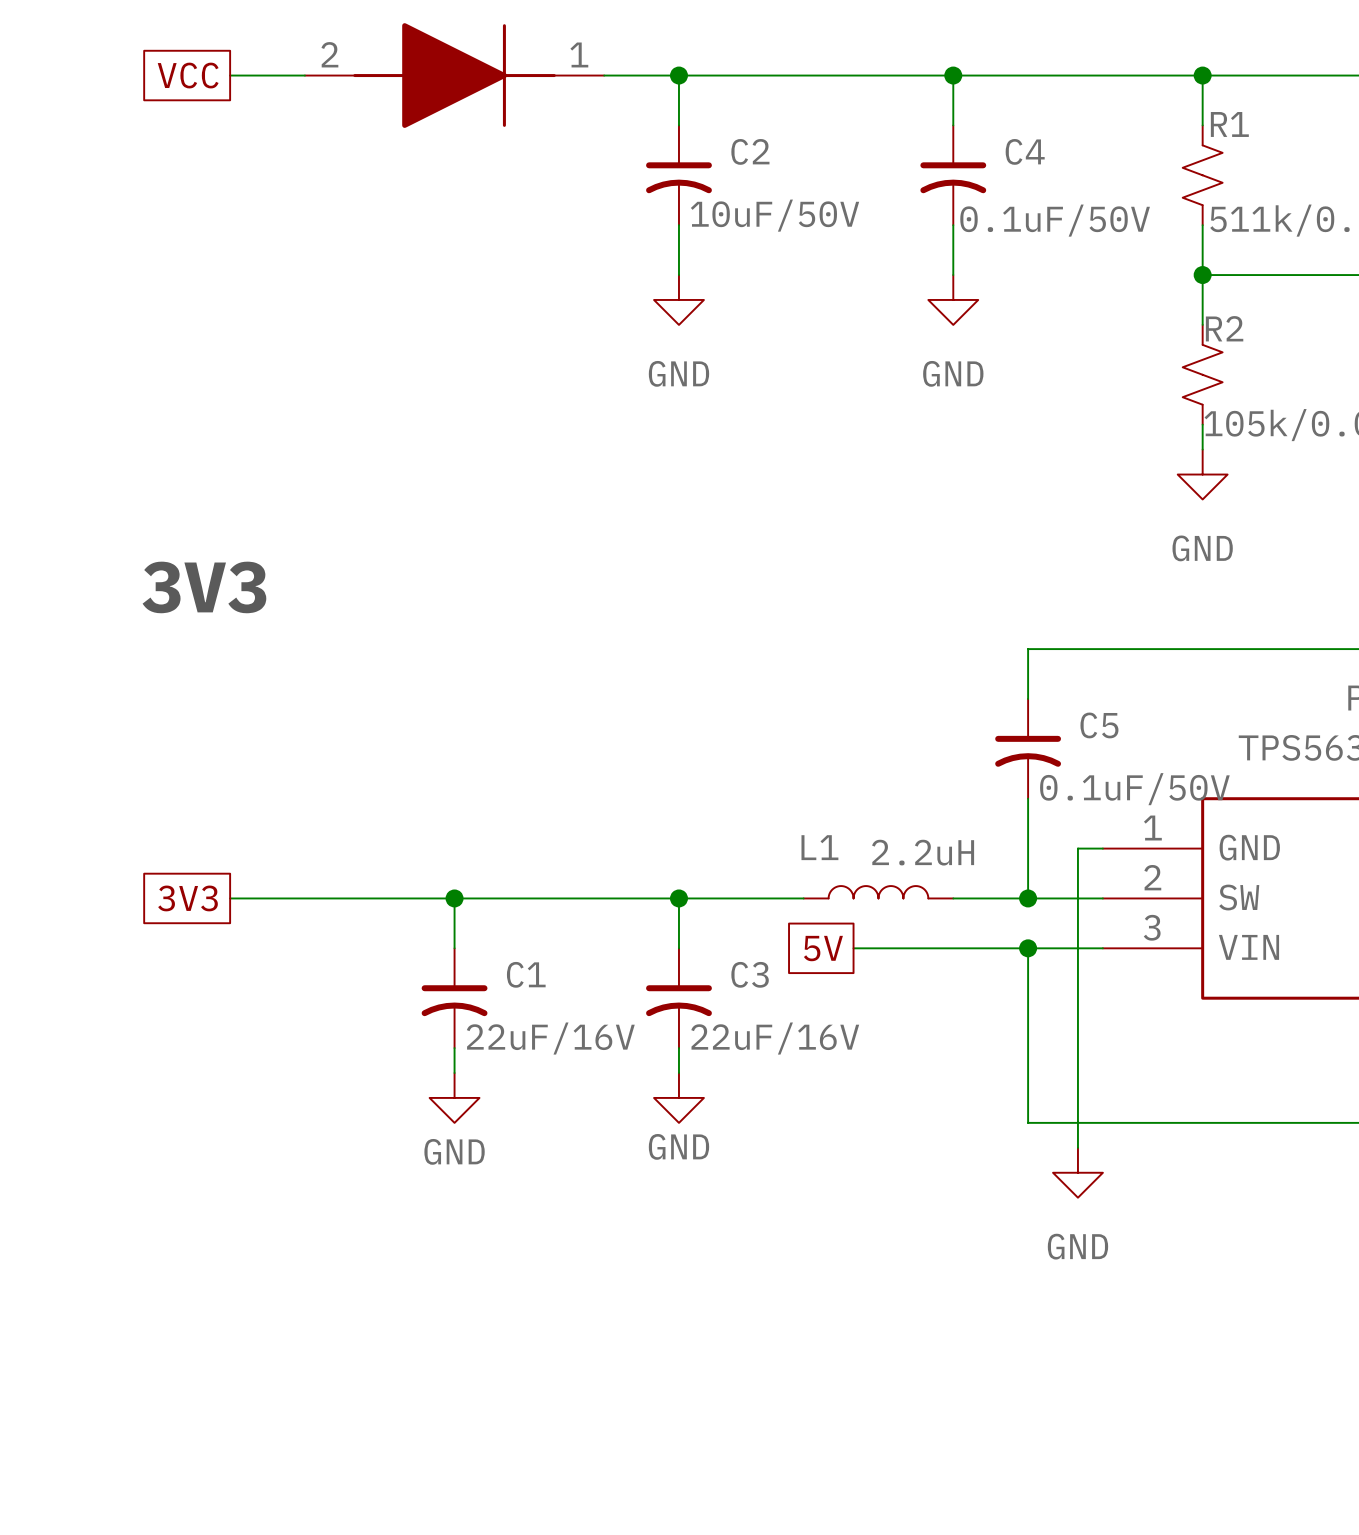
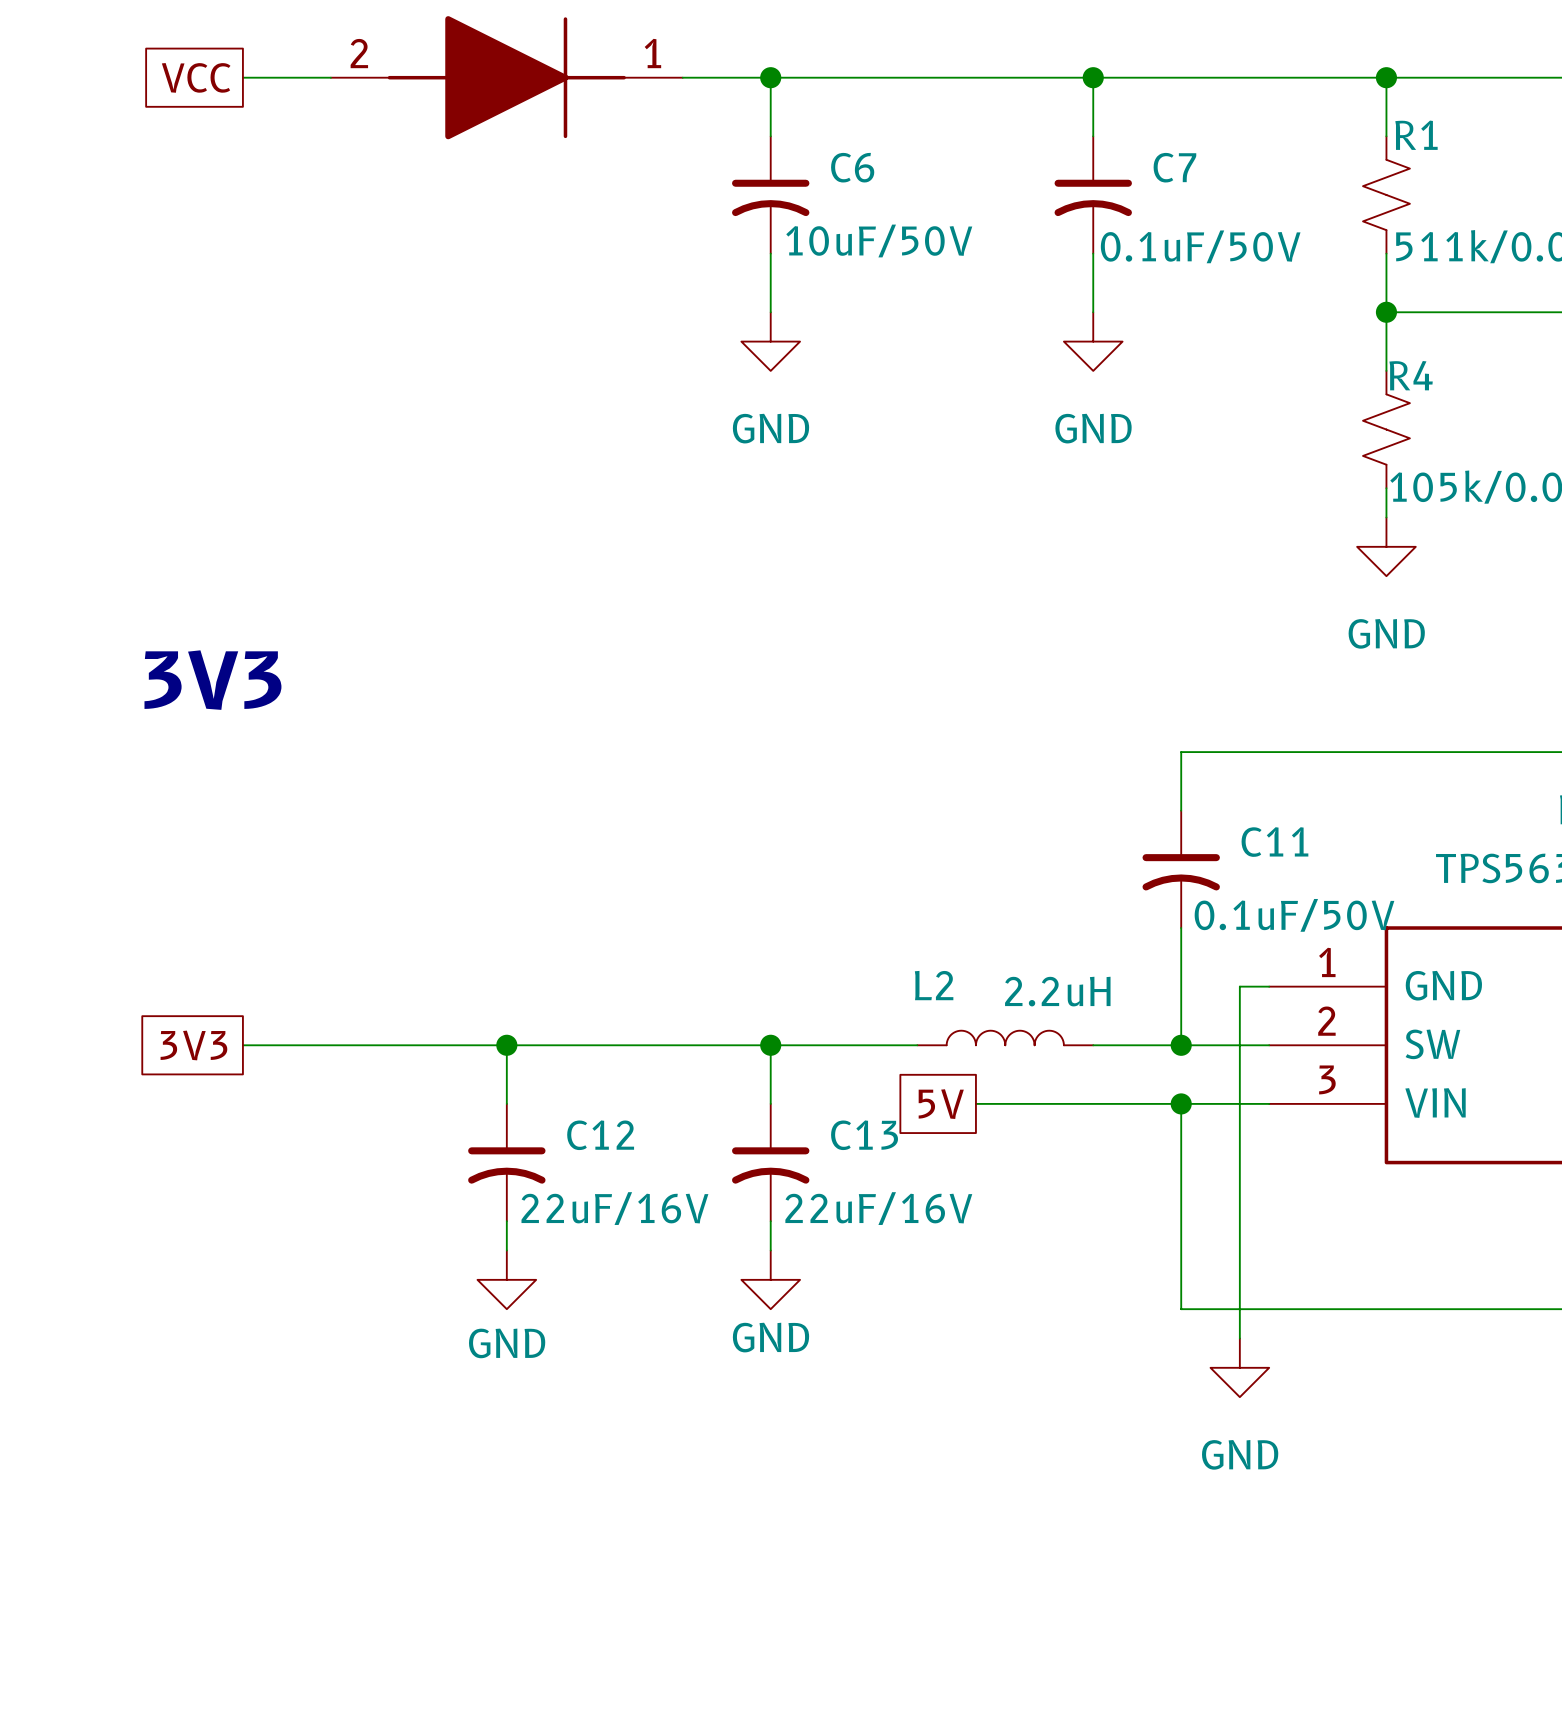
C2 name: C2 (750, 151) -> C6 (852, 167)
C4 name: C4 (1025, 151) -> C7 (1174, 167)
R2 name: R2 (1224, 328) -> R4 (1411, 375)
C5 name: C5 (1099, 725) -> C11 (1274, 842)
L1 name: L1 (819, 847) -> L2 (934, 985)
C1 name: C1 (526, 974) -> C12 (600, 1135)
C3 name: C3 (750, 974) -> C13 (864, 1135)

